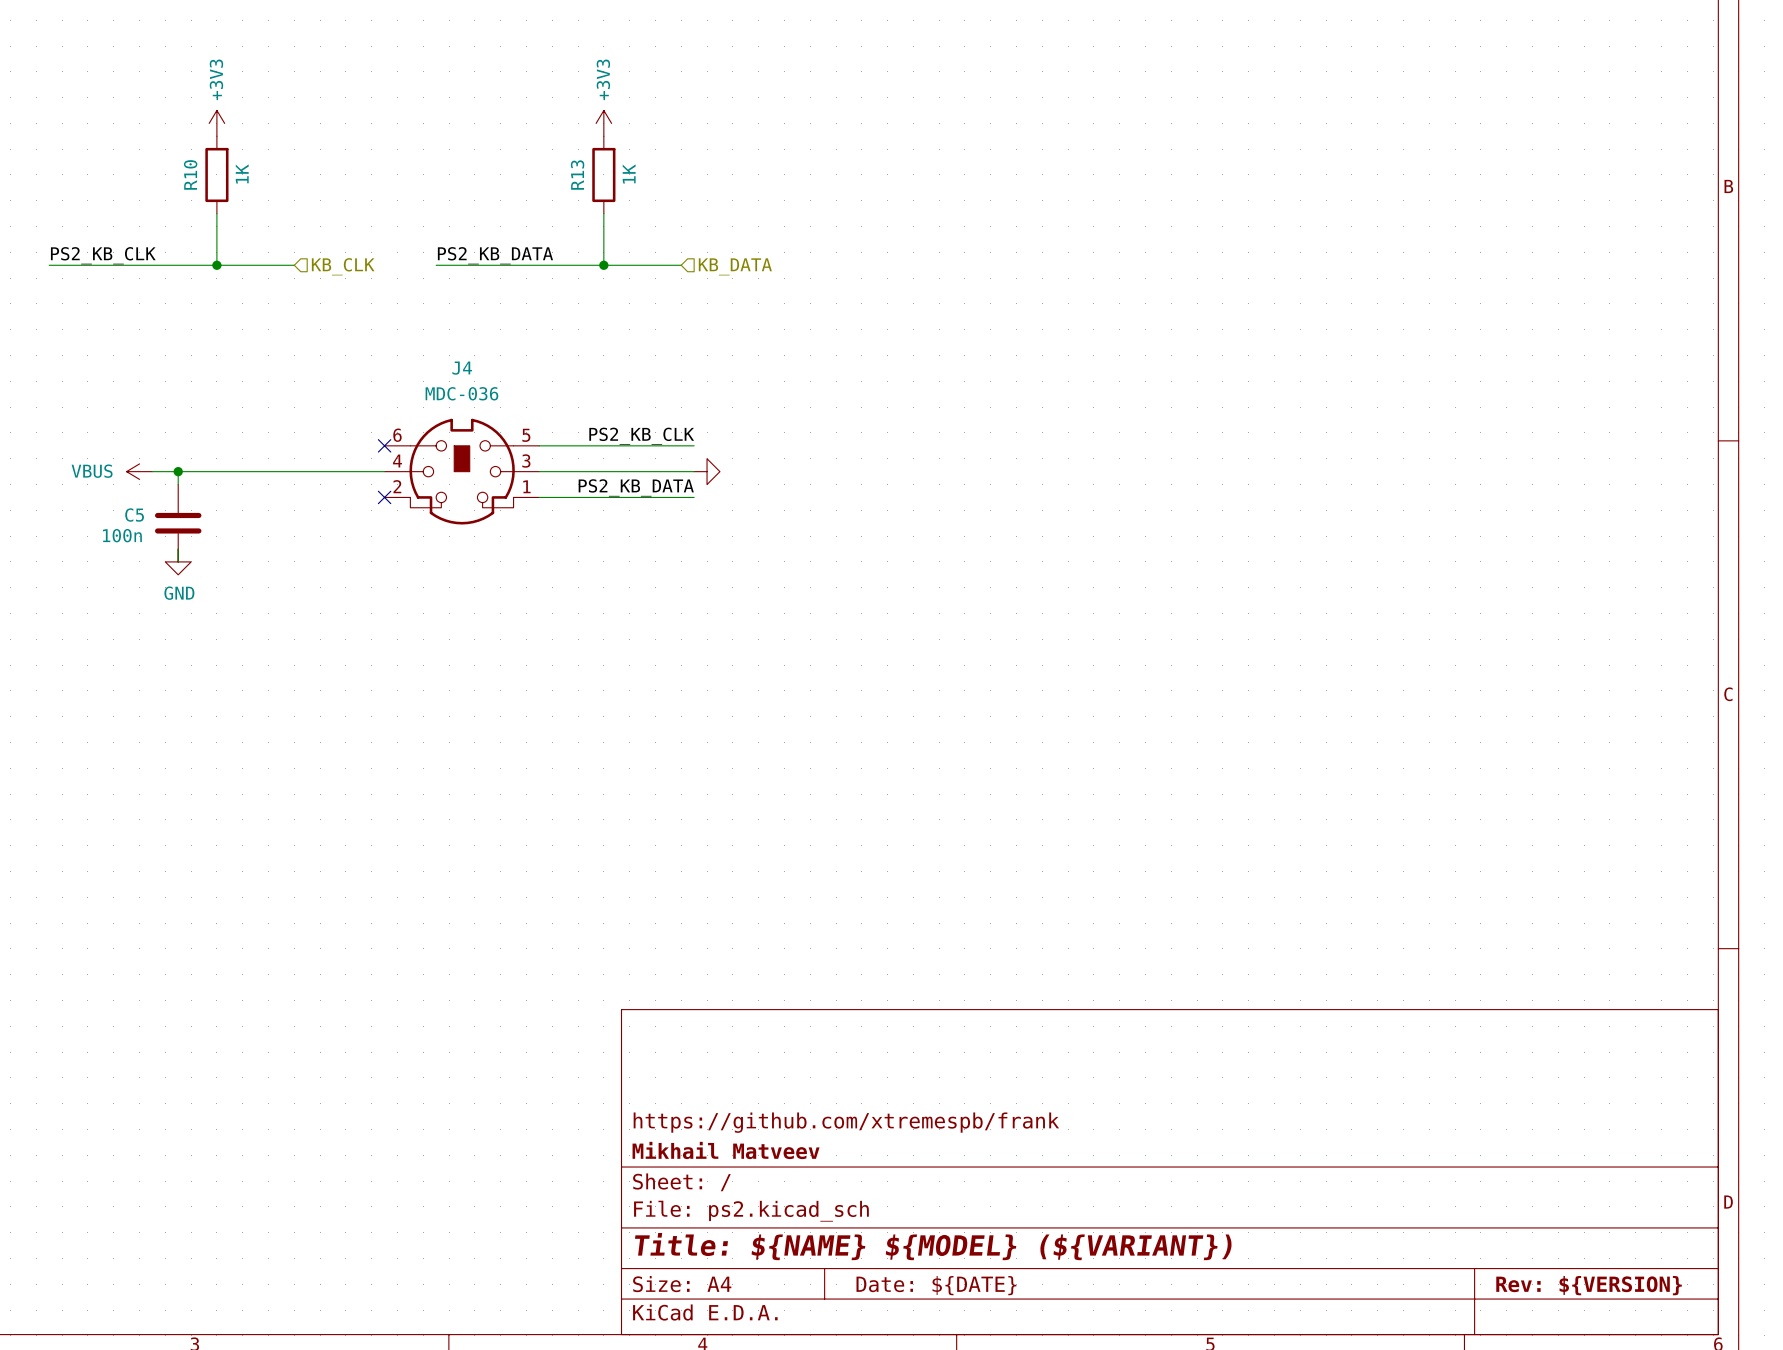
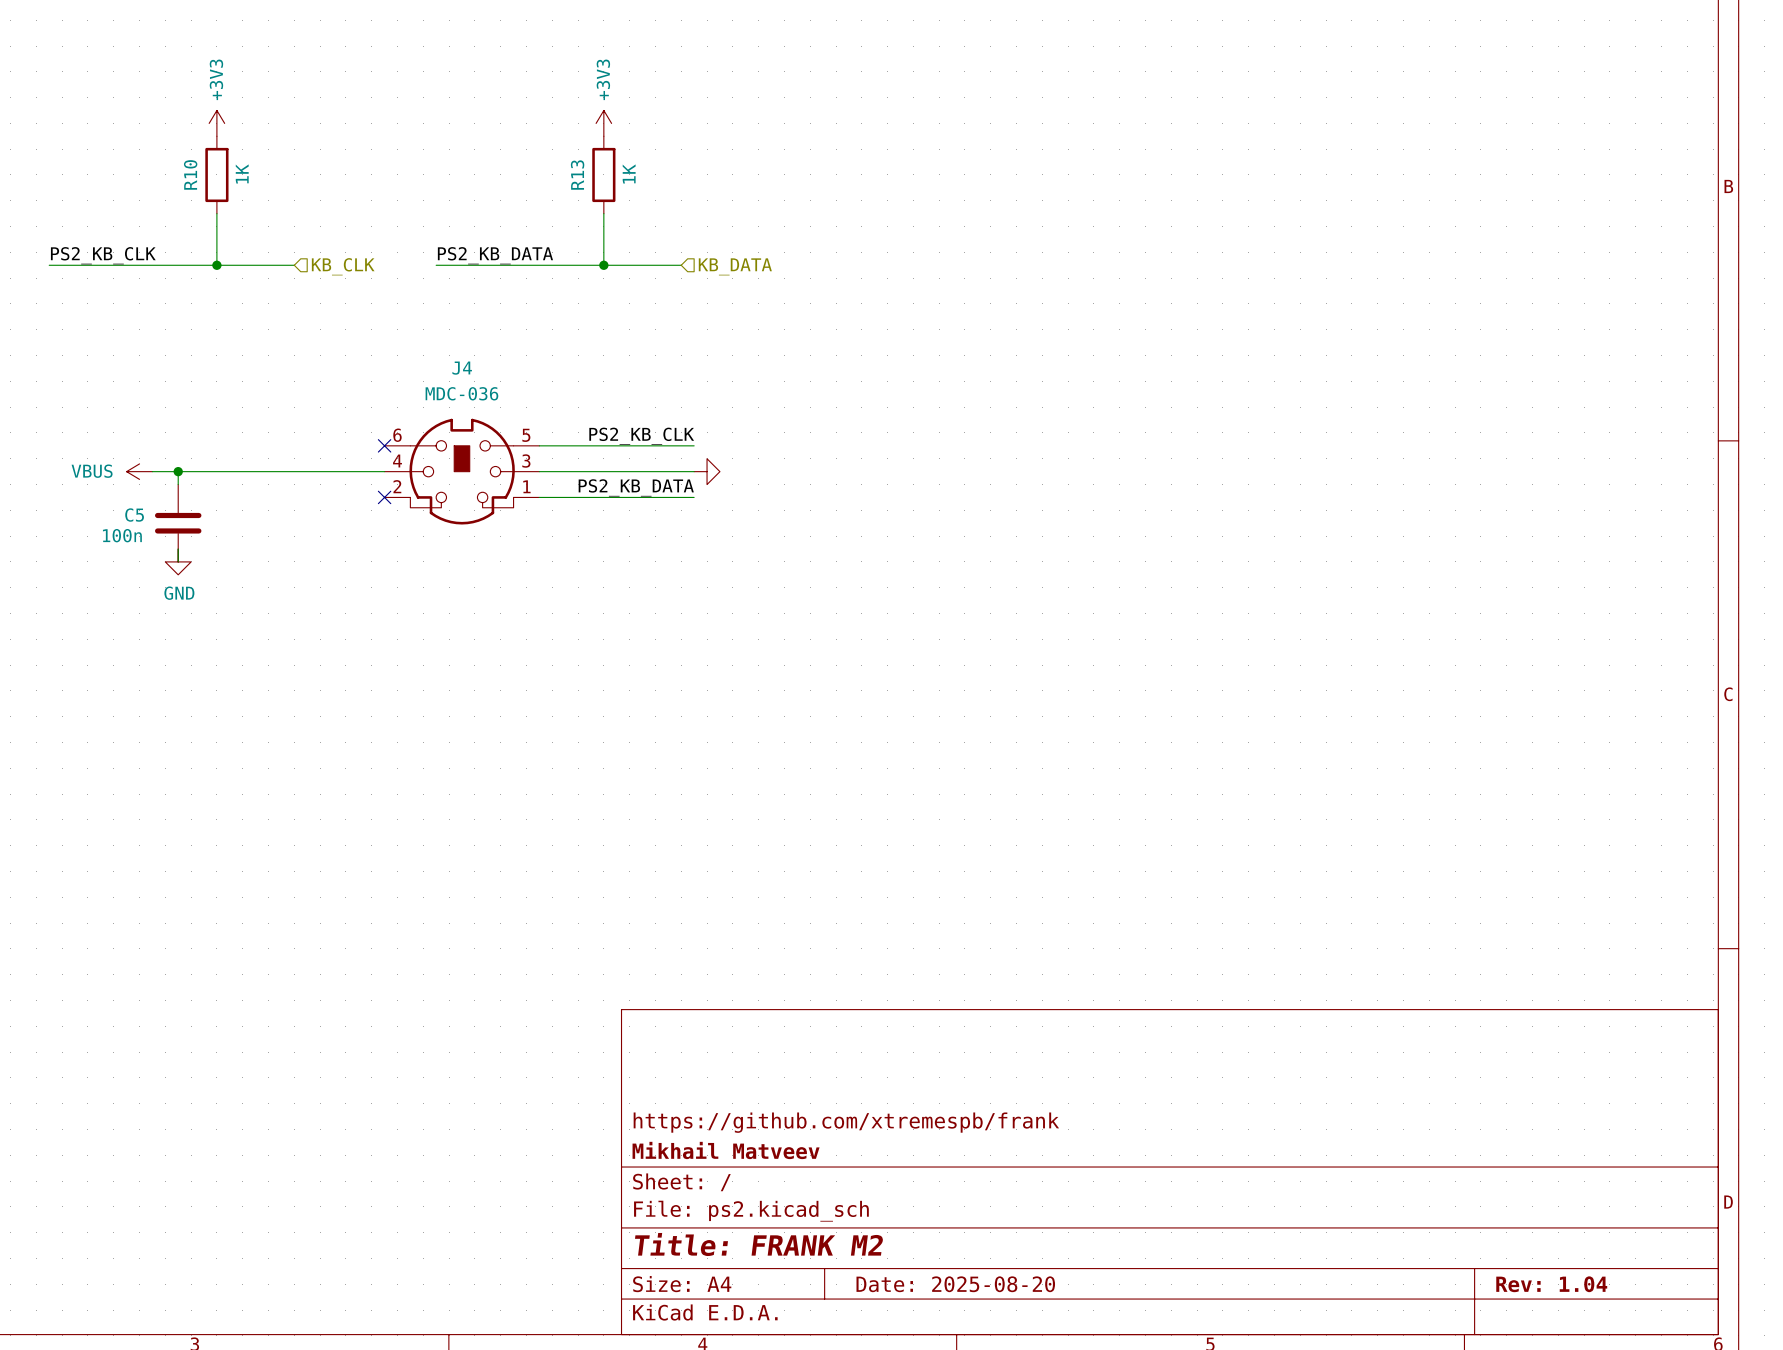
title block: Title: ${NAME} ${MODEL} (${VARIANT}) (933, 1246) -> Title: FRANK M2 (759, 1244)
title block: Date: ${DATE} (936, 1285) -> Date: 2025-08-20 (955, 1284)
title block: Rev: ${VERSION} (1589, 1285) -> Rev: 1.04 (1551, 1284)

